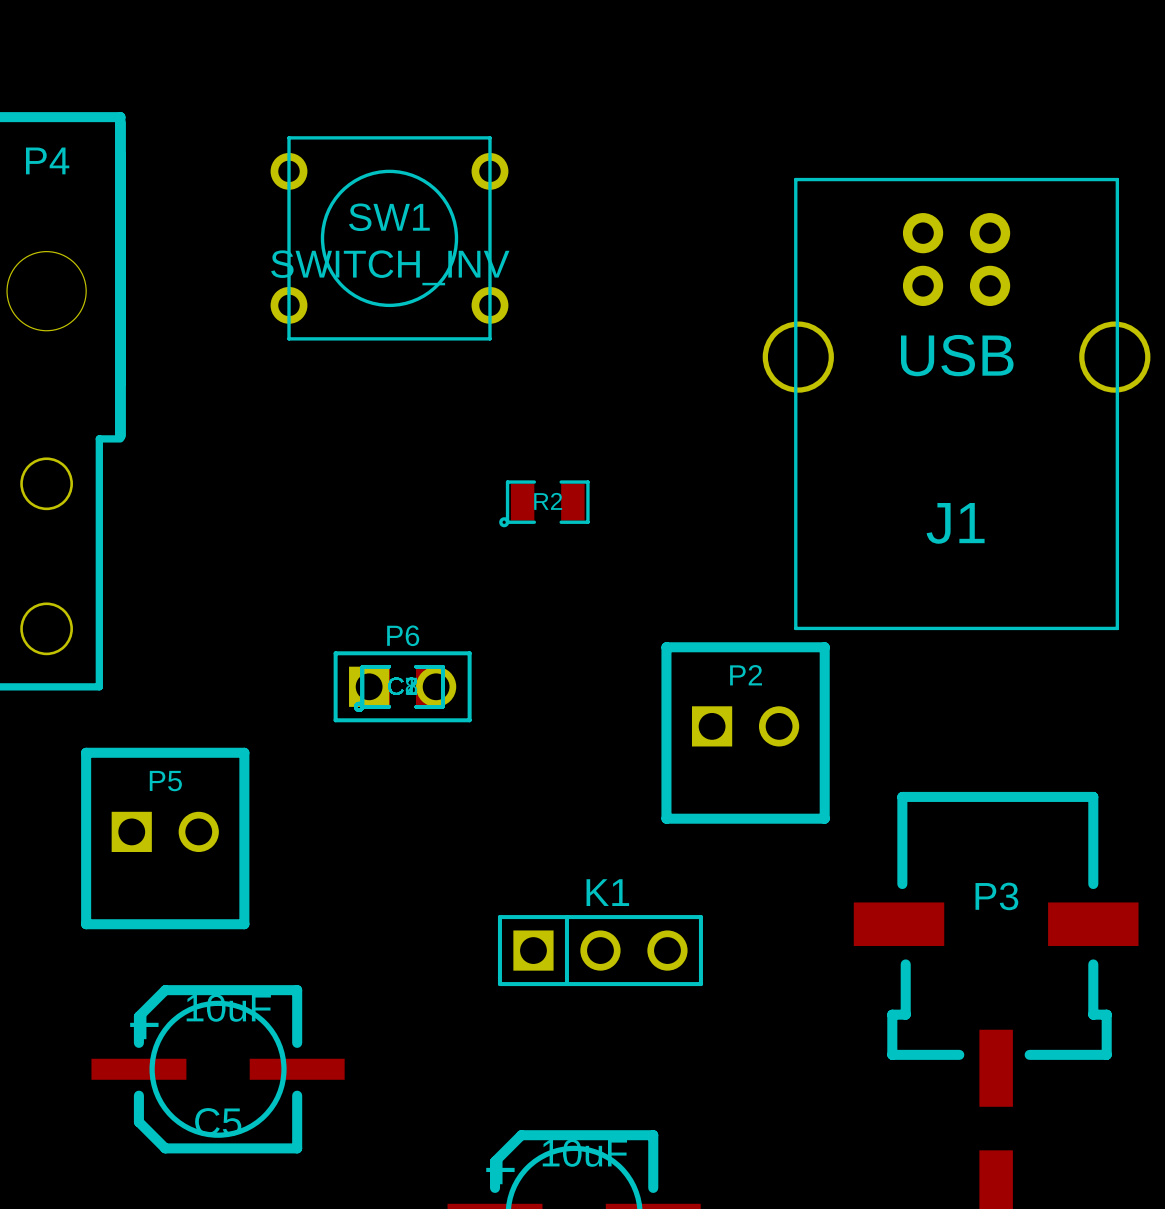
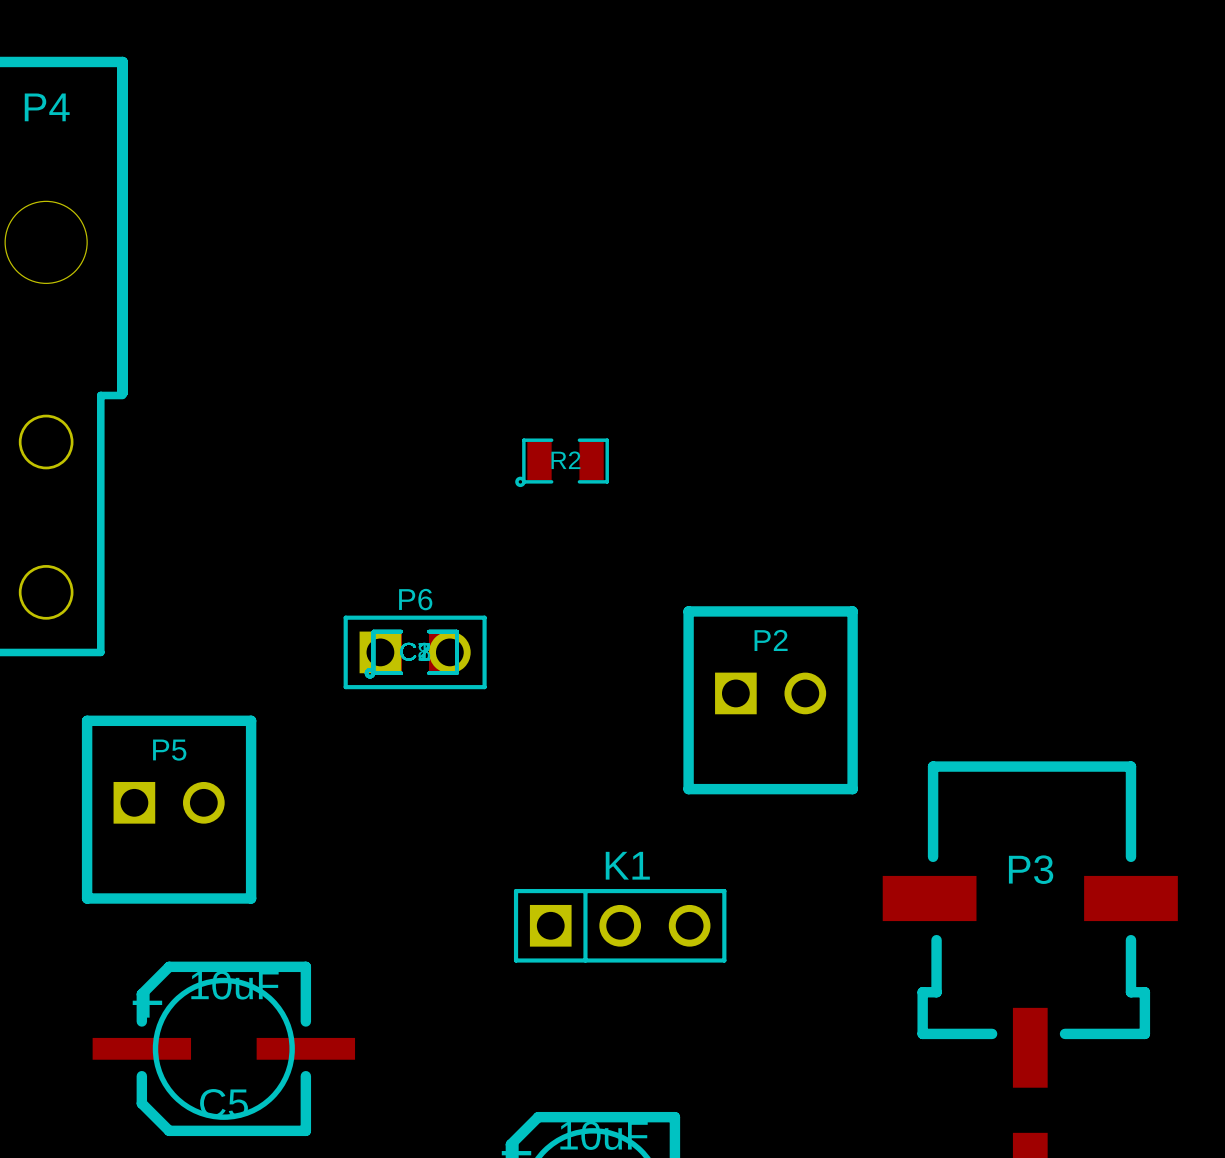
SW1: SWITCH_INV (389, 238) -> none
J1: USB (956, 403) -> none

